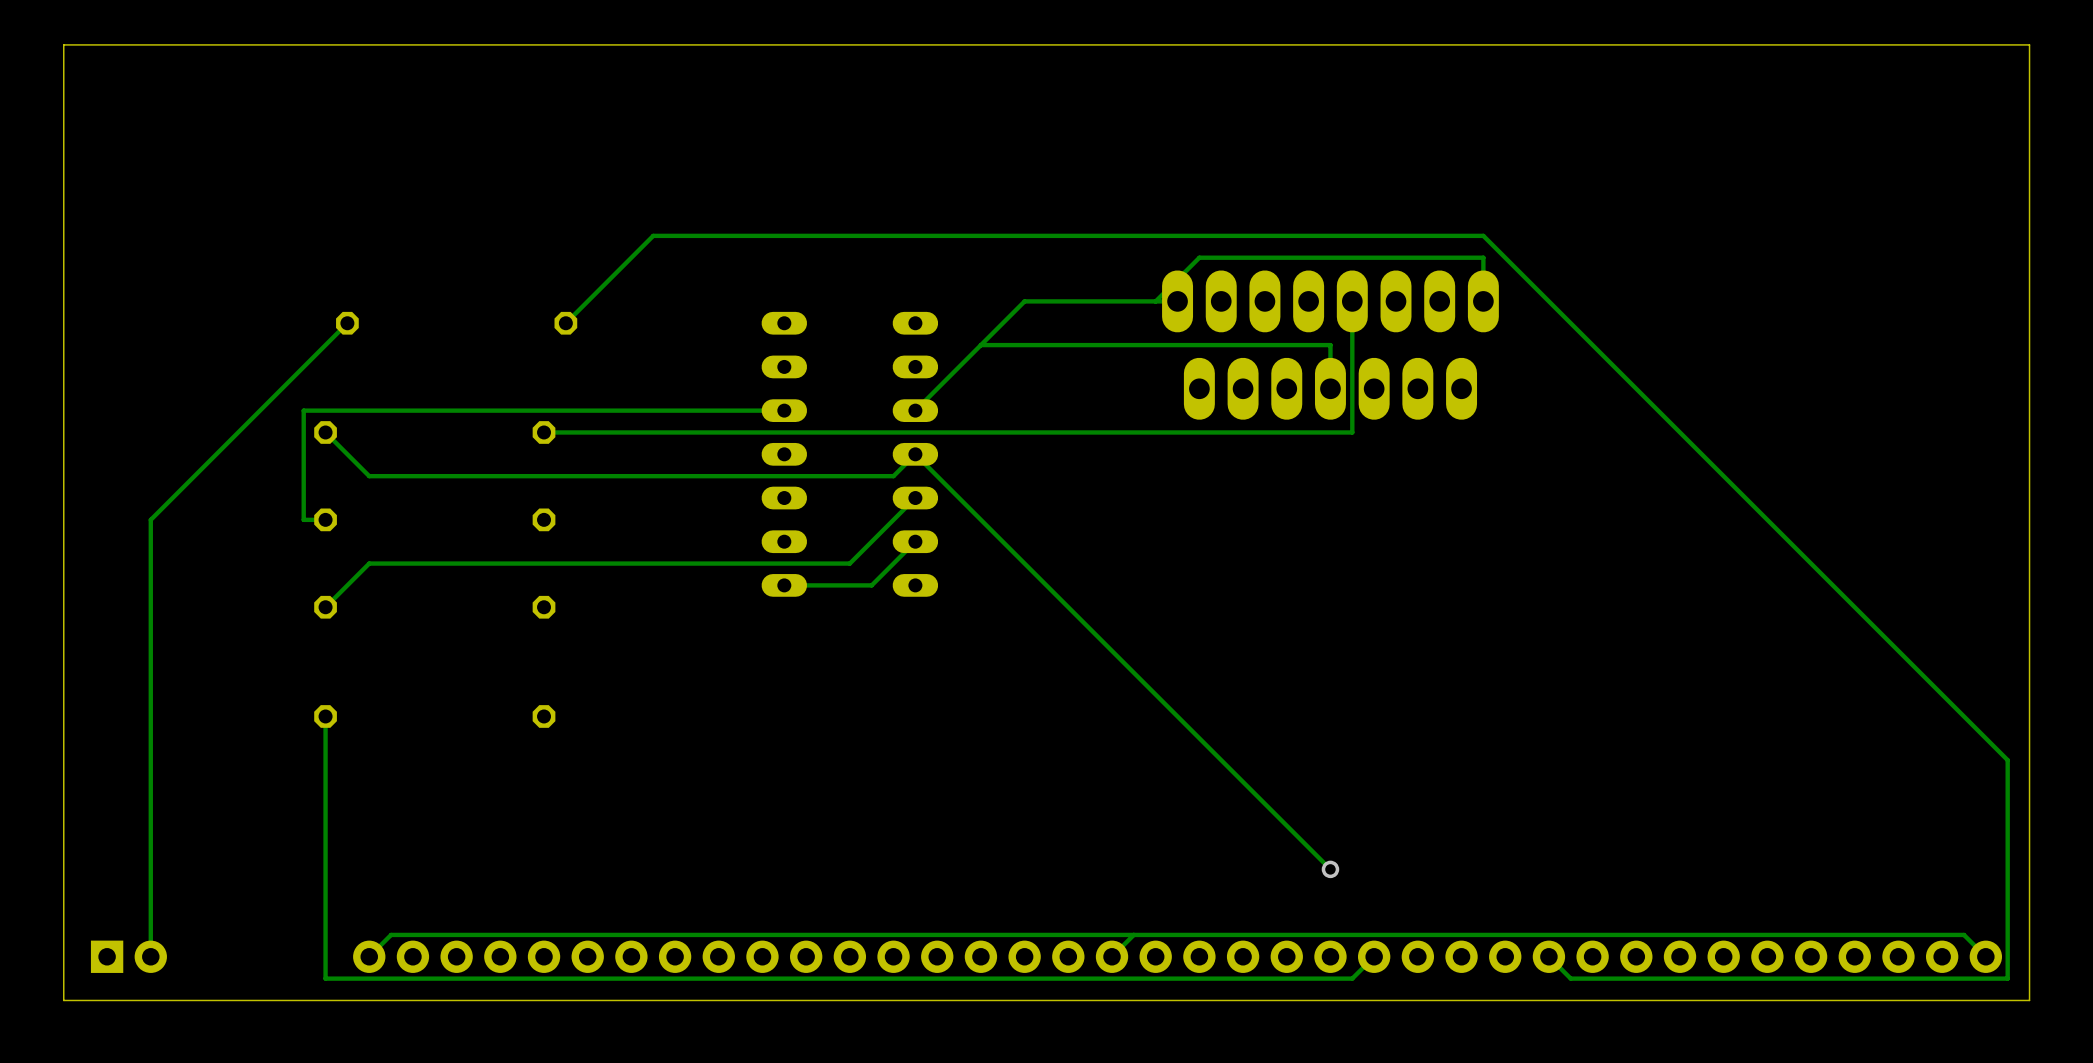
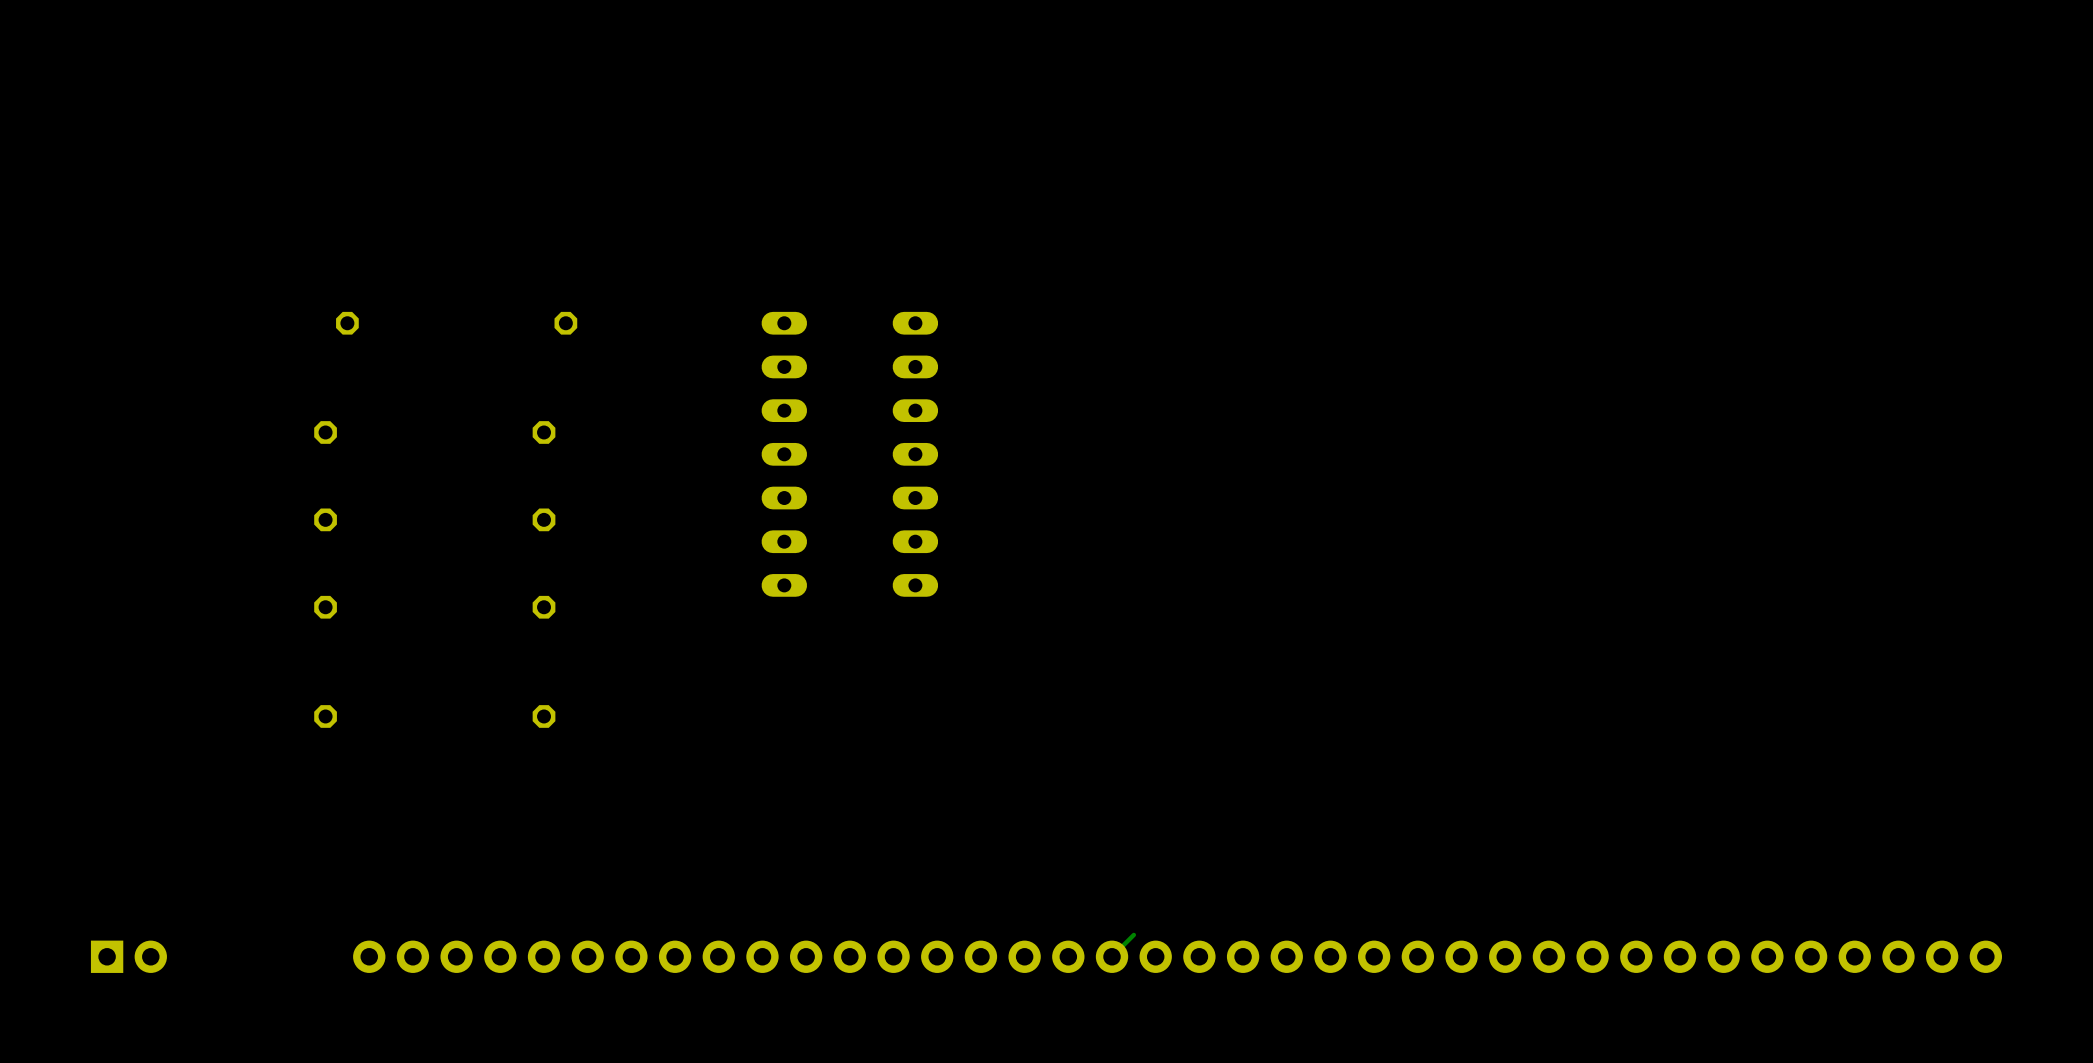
board edge: (2029, 44) (63, 44) (63, 1000) (2029, 1000) (2029, 44) -> none
track: (1177, 301) (1024, 301) (915, 410) -> none
track: (1352, 301) (1352, 432) (544, 432) -> none
track: (1483, 301) (1483, 257) (1199, 257) (1155, 301) -> none
track: (347, 323) (150, 519) (150, 956) -> none
track: (565, 323) (653, 235) (1483, 235) (2007, 760) (2007, 978) (1570, 978) (1548, 956) -> none
track: (980, 345) (1330, 345) (1330, 388) -> none
part: (1330, 345) -> none
track: (784, 410) (303, 410) (303, 519) (325, 519) -> none
track: (325, 432) (369, 476) (893, 476) (915, 454) (1330, 869) -> none
track: (915, 498) (849, 563) (369, 563) (325, 607) -> none
track: (915, 541) (871, 585) (784, 585) -> none
track: (325, 716) (325, 978) (1352, 978) (1374, 956) -> none
via: (1330, 869) -> none
track: (1985, 956) (1963, 934) (391, 934) (369, 956) -> none

